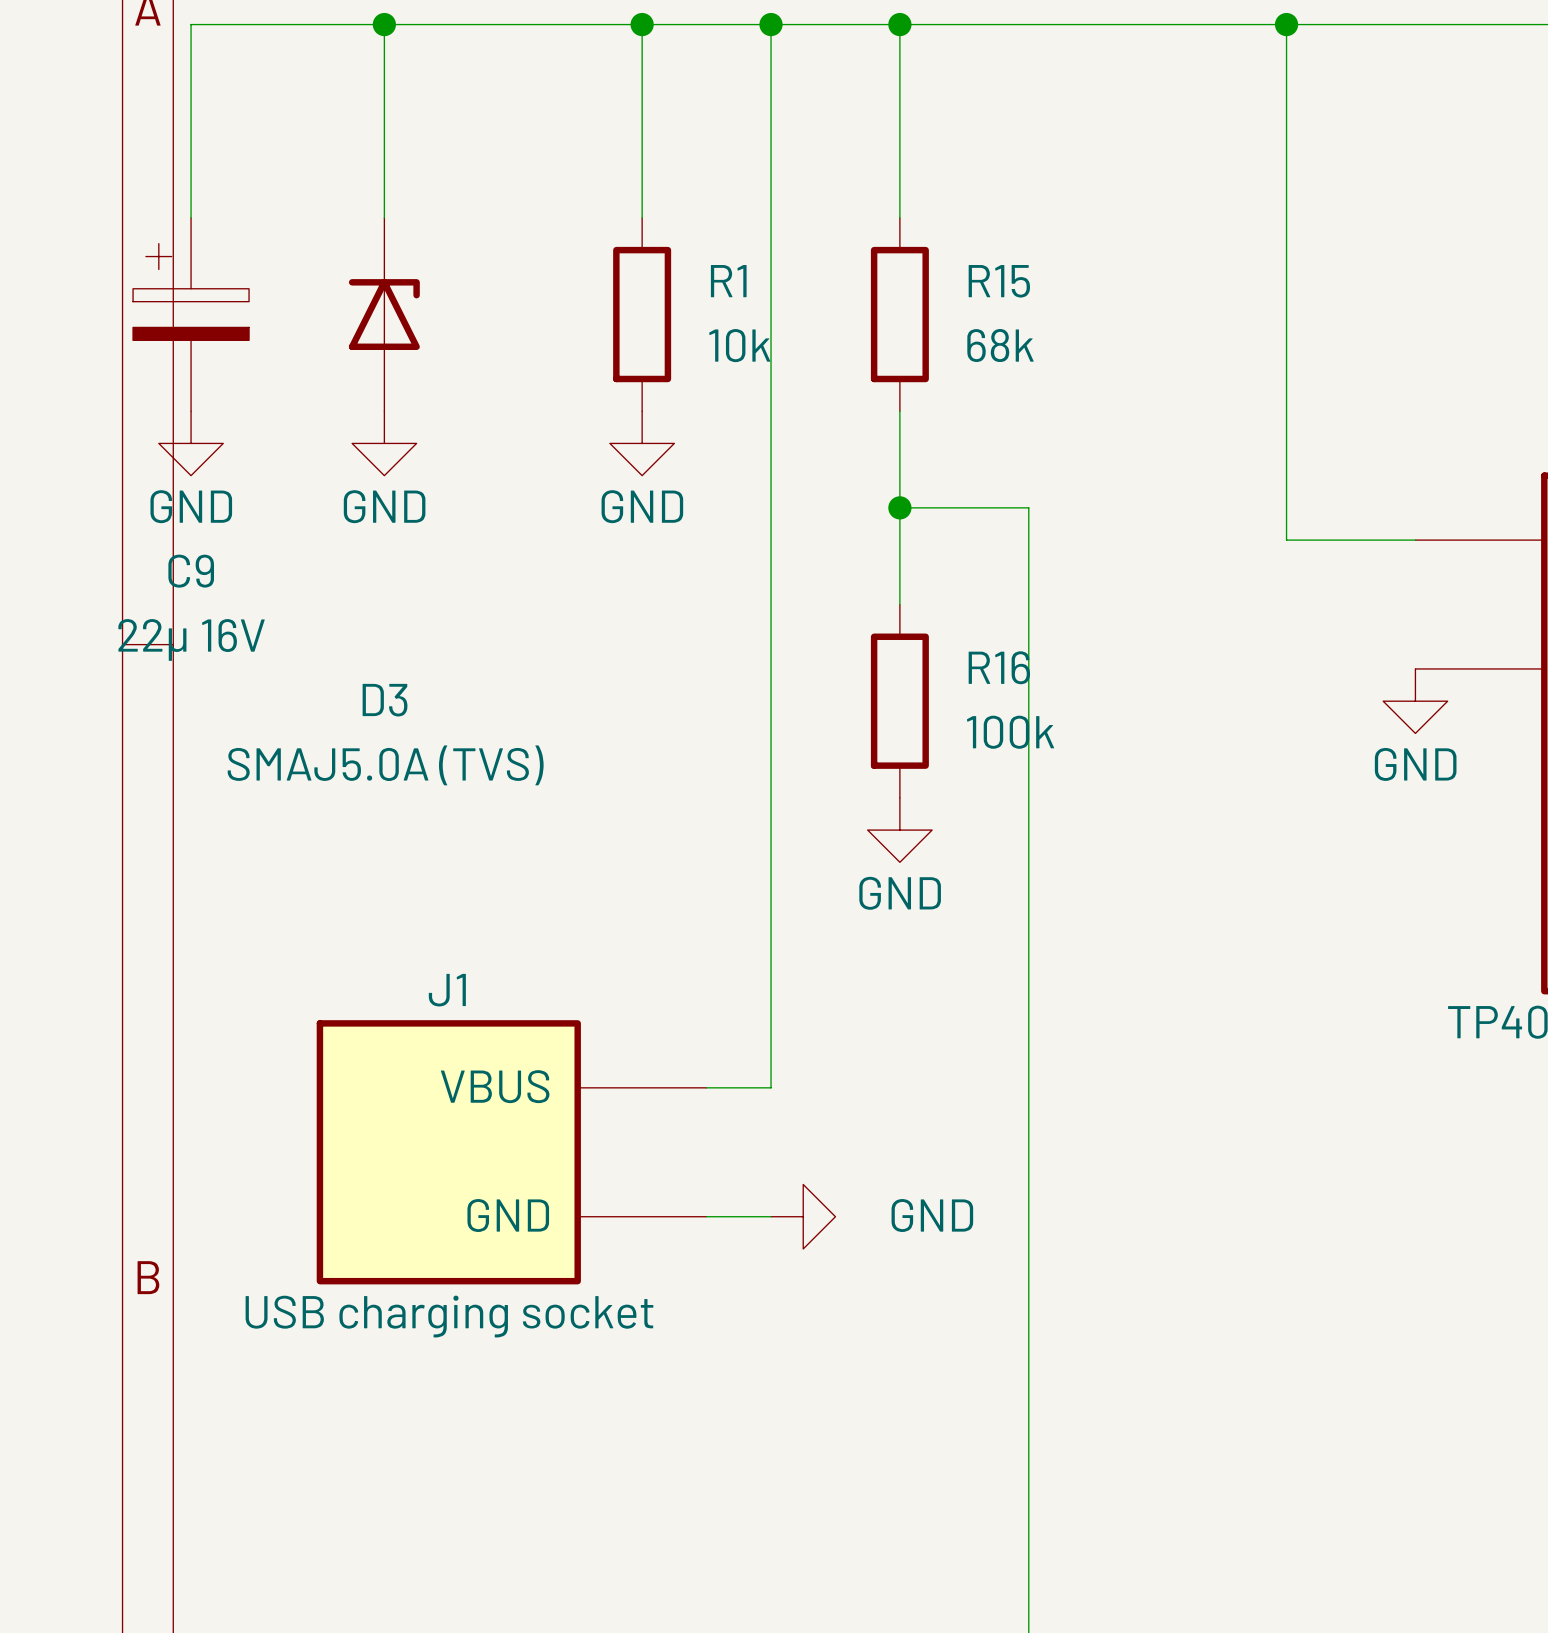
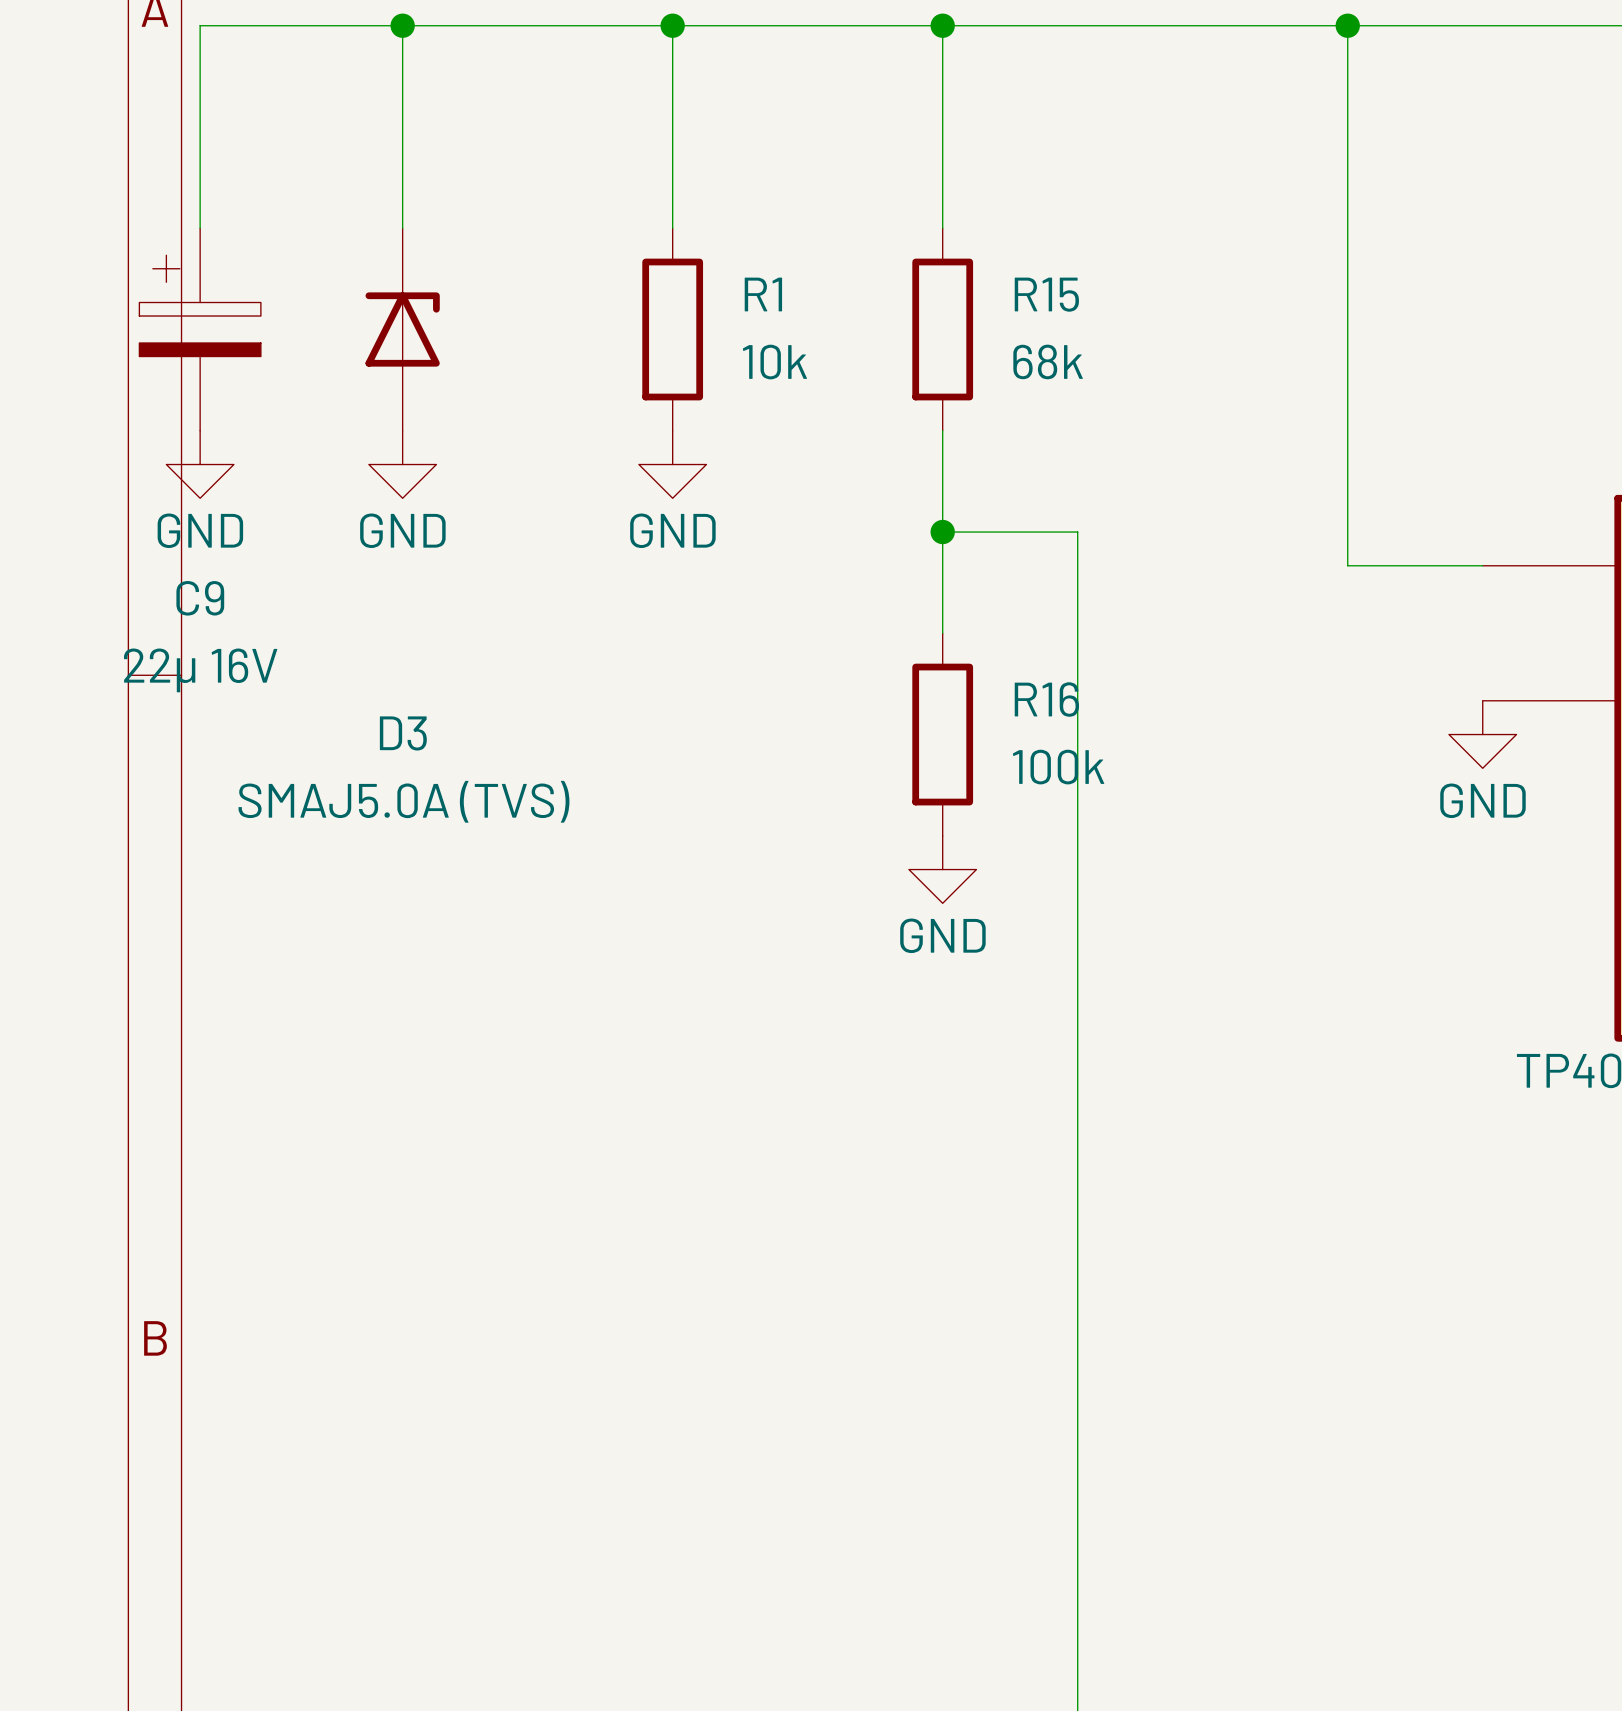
wire: (771, 24) (771, 1087) (706, 1087) -> none
junction: (771, 24) -> none
J1: USB charging socket (511, 1152) -> none
wire: (706, 1216) (771, 1216) -> none
power symbol: GND (803, 1216) -> none

